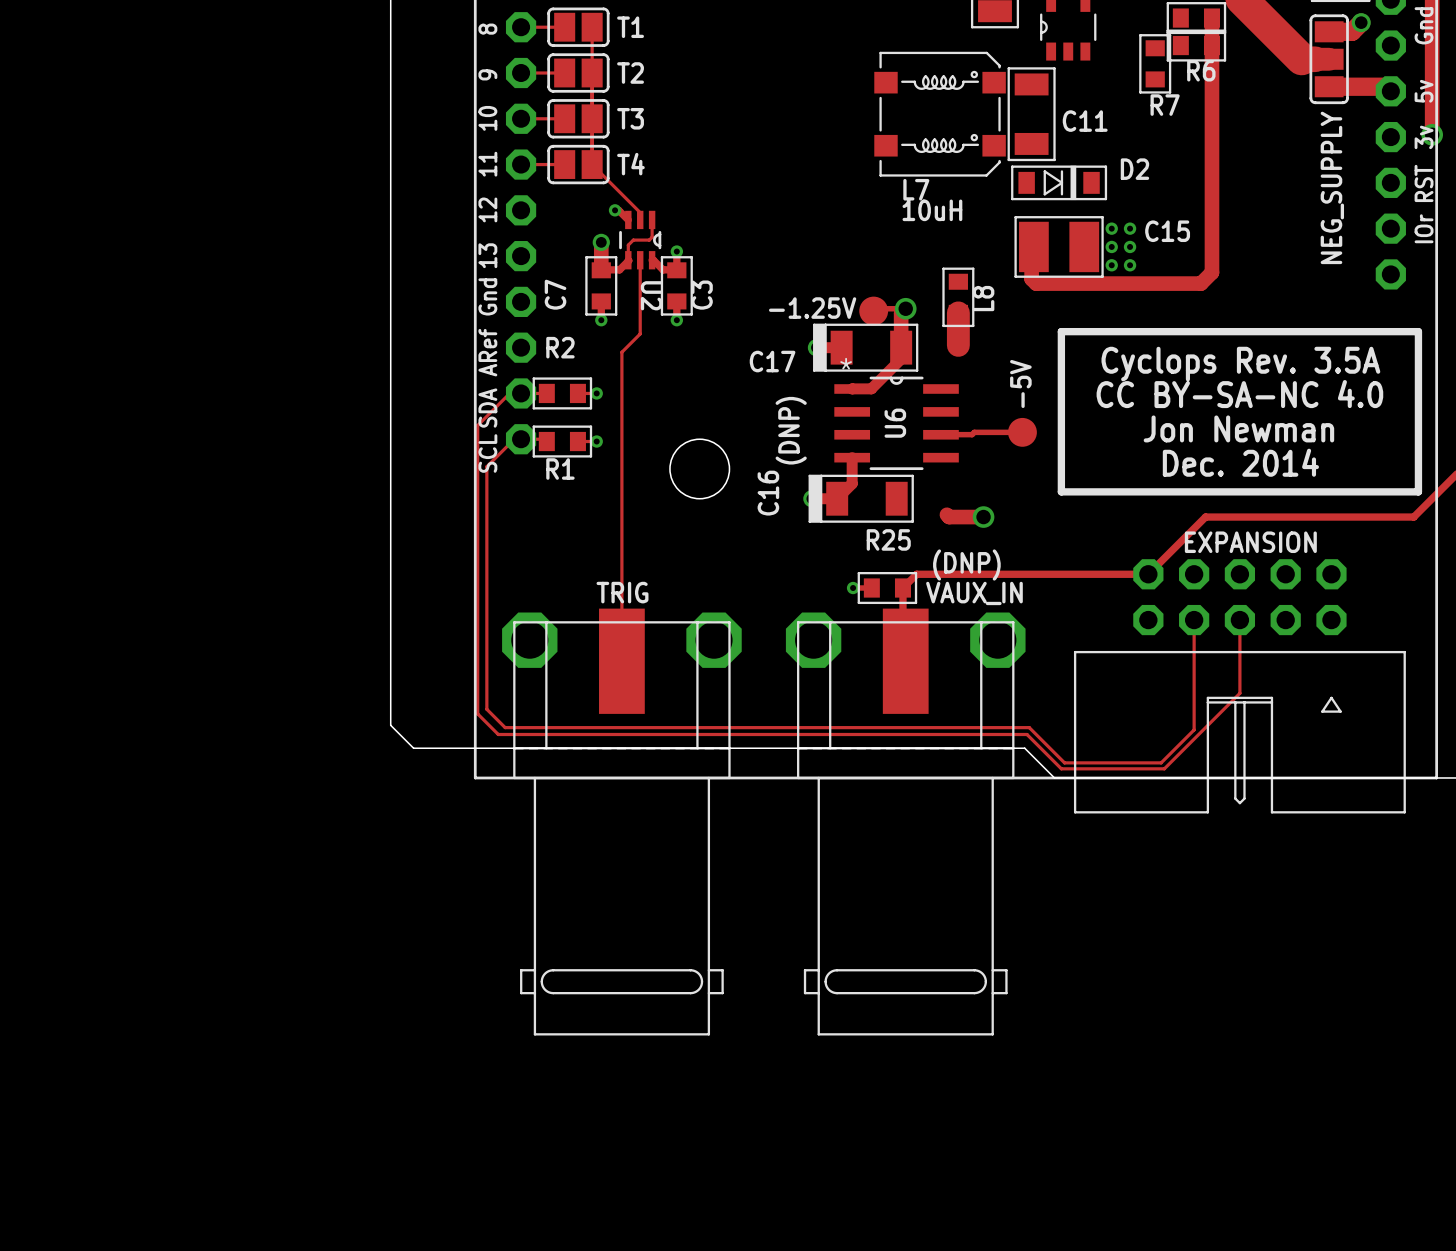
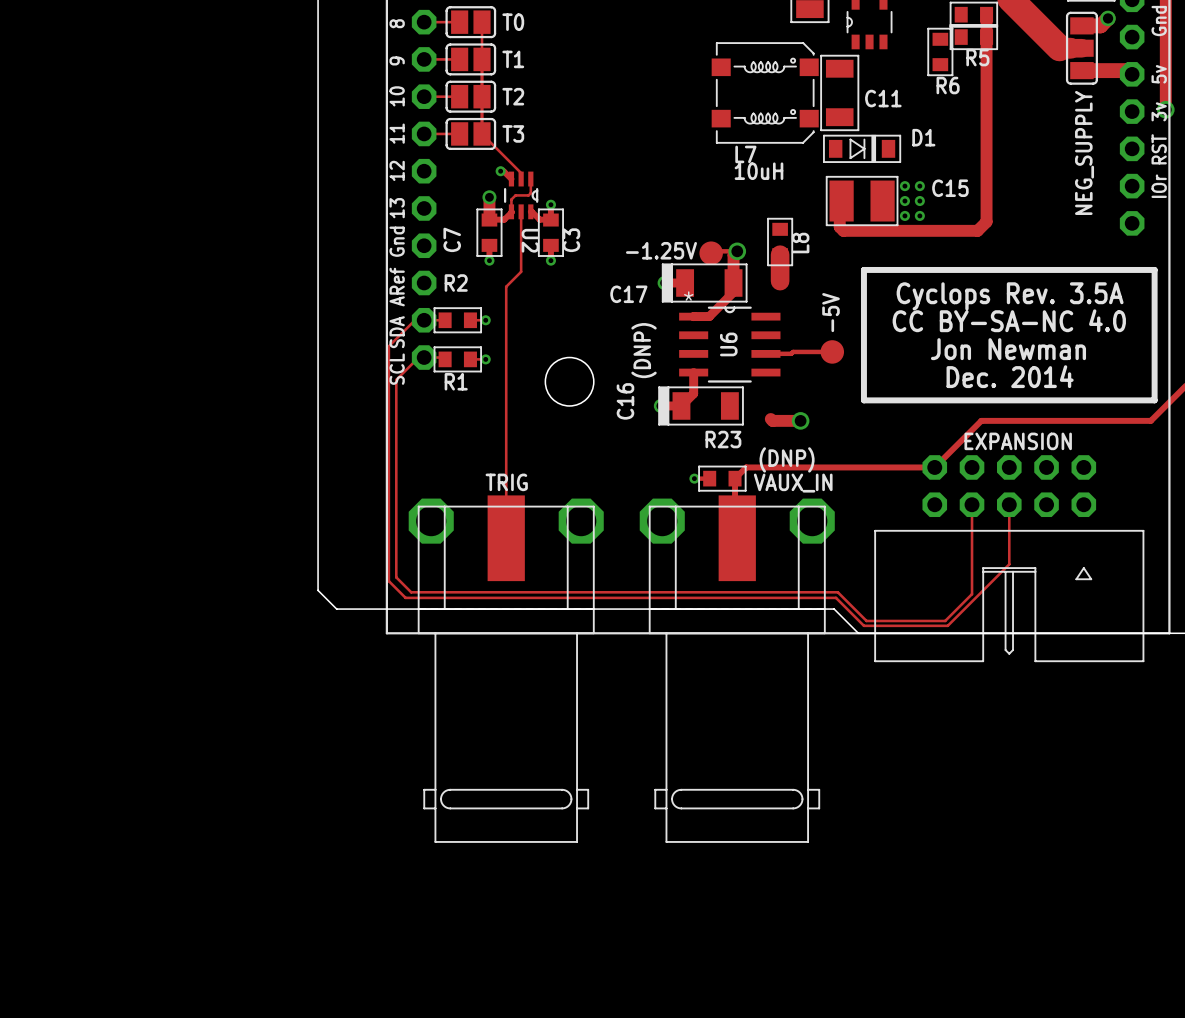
T1 name: T1 (630, 27) -> T0 (513, 22)
R6 name: R6 (1201, 70) -> R5 (977, 57)
T2 name: T2 (630, 73) -> T1 (513, 59)
R7 name: R7 (1165, 105) -> R6 (948, 85)
T3 name: T3 (630, 118) -> T2 (513, 96)
T4 name: T4 (630, 164) -> T3 (513, 133)
D2 name: D2 (1134, 169) -> D1 (923, 137)
R25 name: R25 (888, 539) -> R23 (723, 439)

